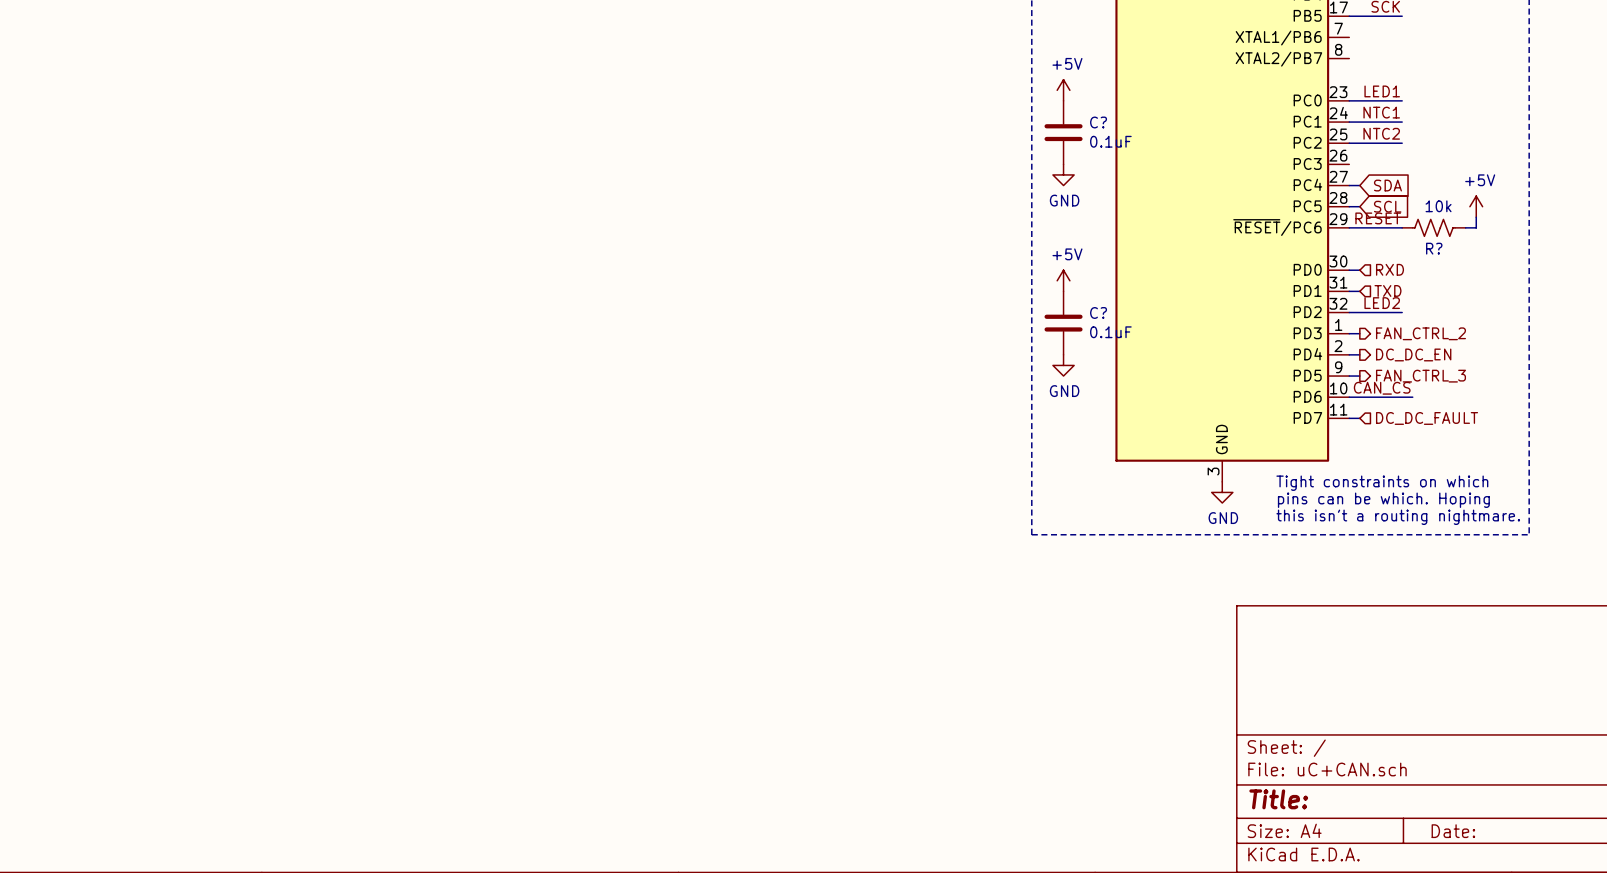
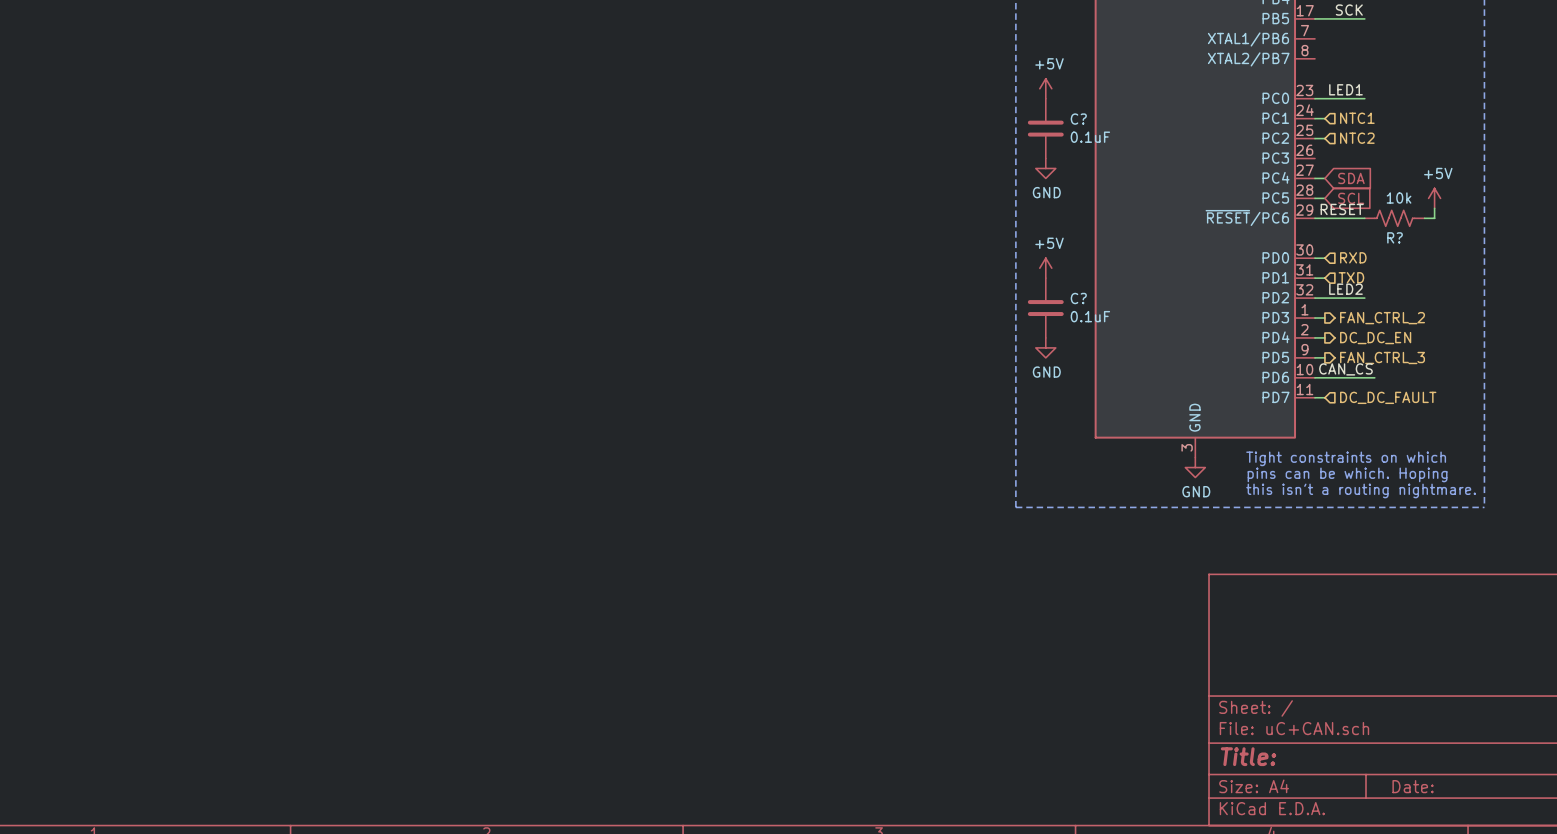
label: NTC1 (1381, 112) -> none
hierarchical label: none -> NTC1 (1357, 118)
wire: (1359, 122) (1402, 122) -> none
label: NTC2 (1381, 133) -> none
hierarchical label: none -> NTC2 (1357, 138)
wire: (1359, 143) (1402, 143) -> none

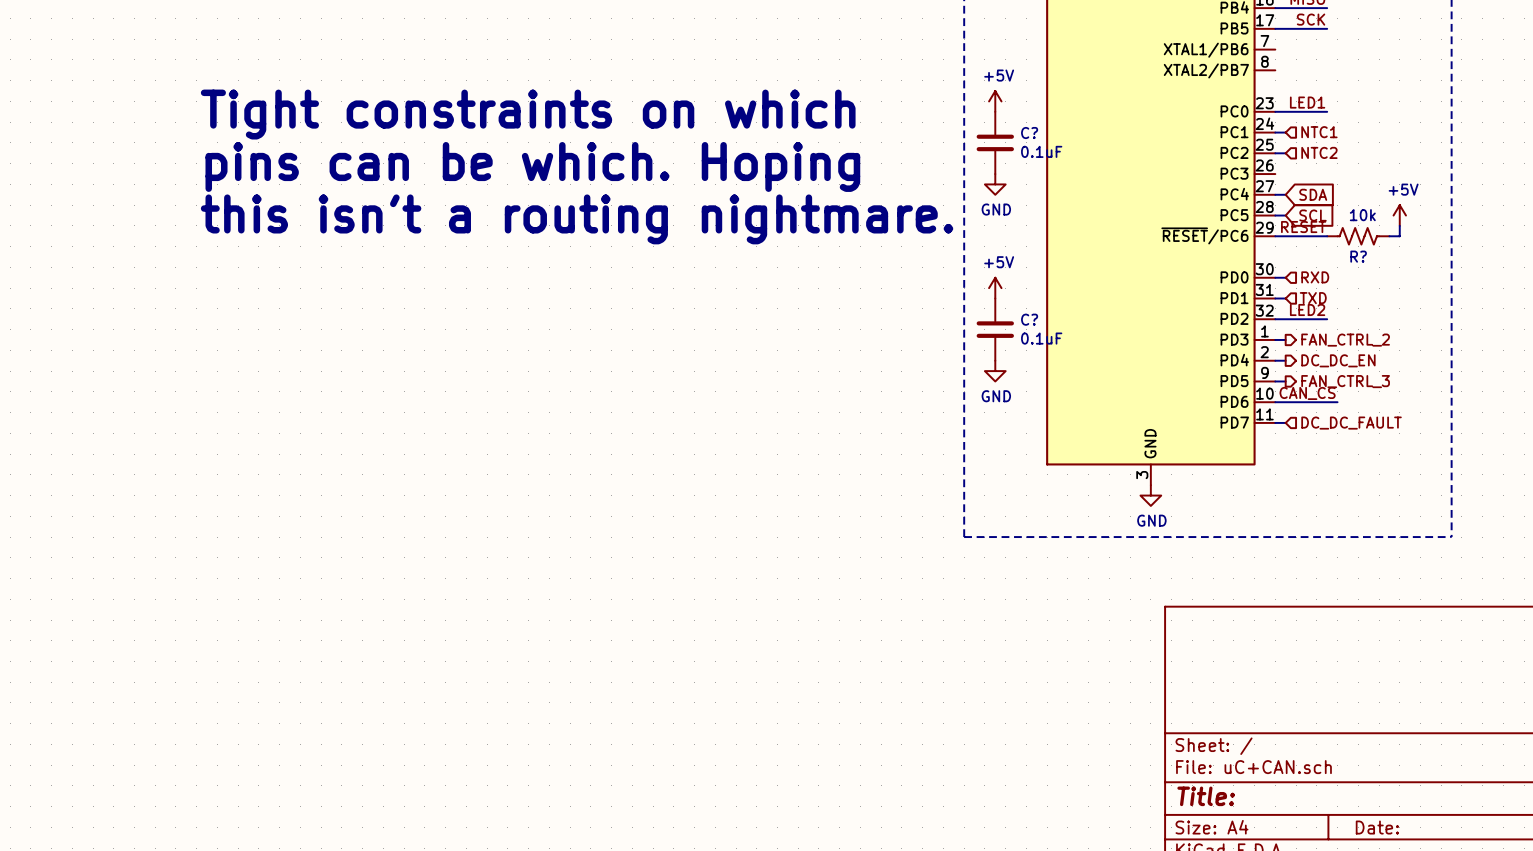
text: none -> Tight constraints on which (528, 114)
text: none -> pins can be which. Hoping (532, 166)
text: none -> this isn't a routing nightmare. (577, 219)
text: Tight constraints on which (1346, 458) -> none
text: pins can be which. Hoping (1347, 474) -> none
text: this isn't a routing nightmare. (1361, 490) -> none

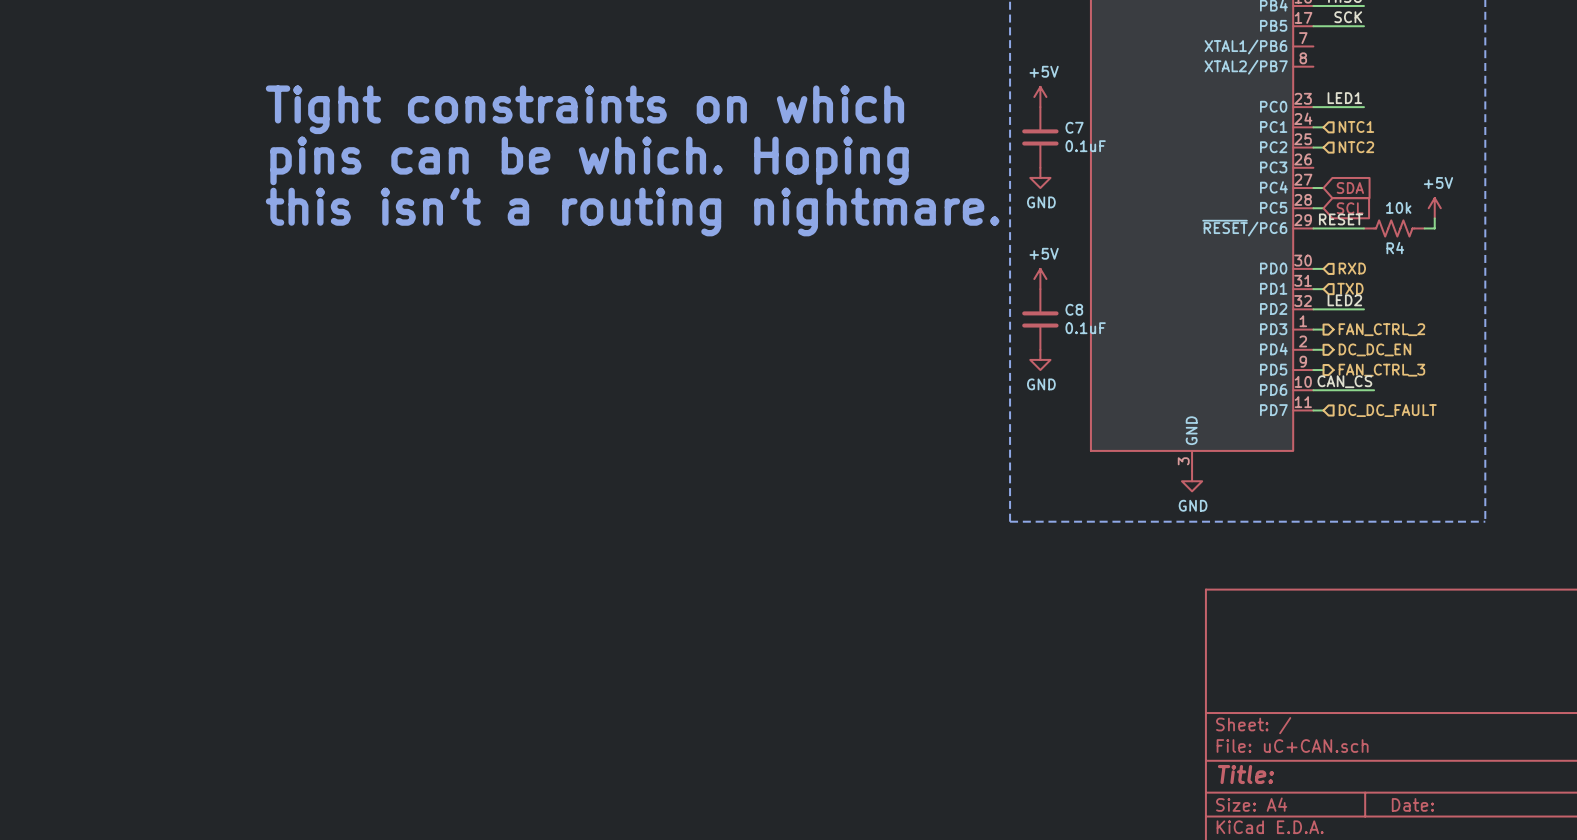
C? name: C? (1029, 133) -> C7 (1074, 127)
R? name: R? (1358, 256) -> R4 (1395, 248)
C? name: C? (1029, 319) -> C8 (1074, 309)

